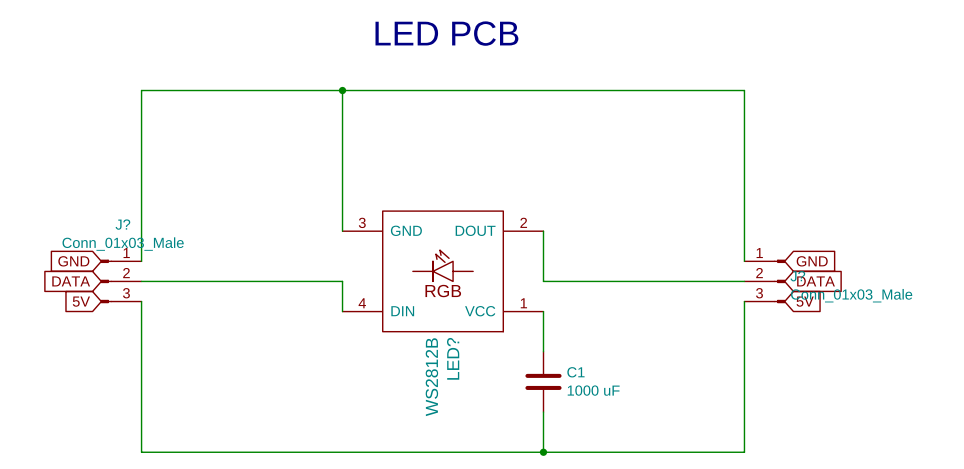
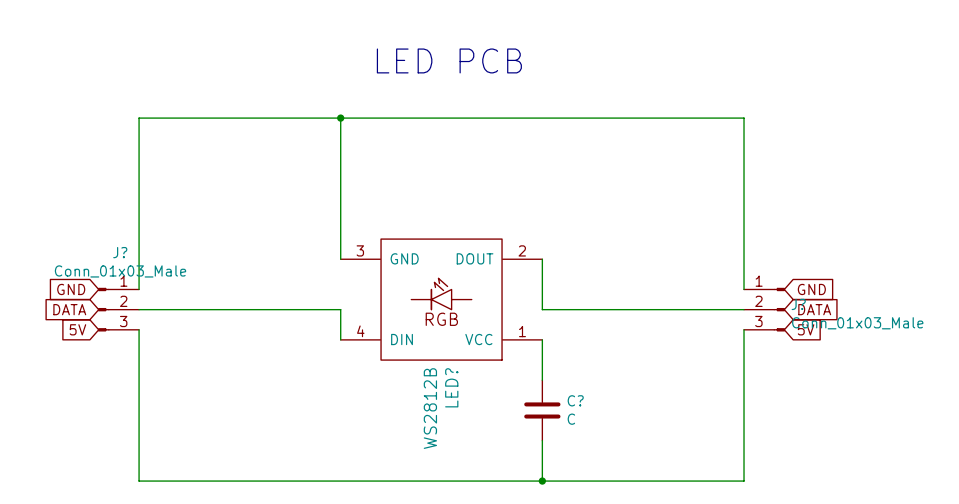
C1 name: C1 (575, 372) -> C? (575, 400)
C1 value: 1000 uF (593, 390) -> C (571, 419)

